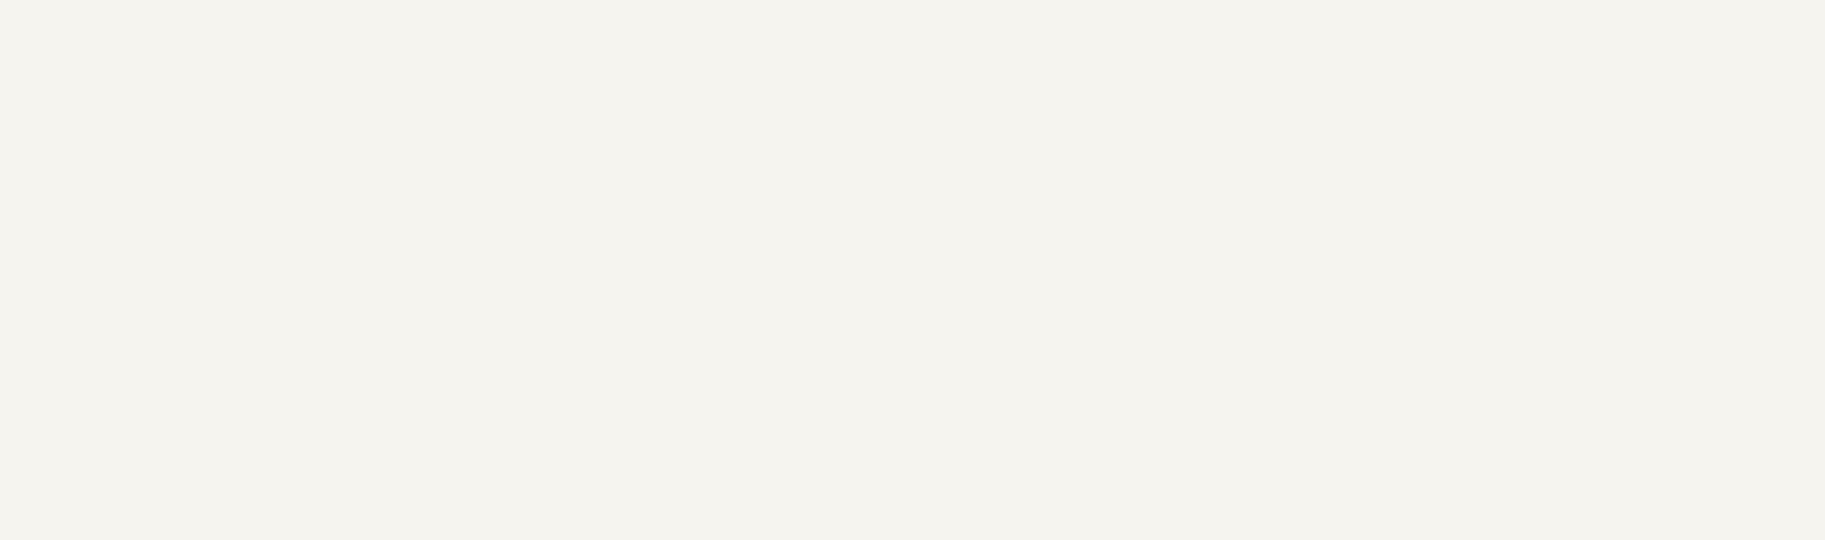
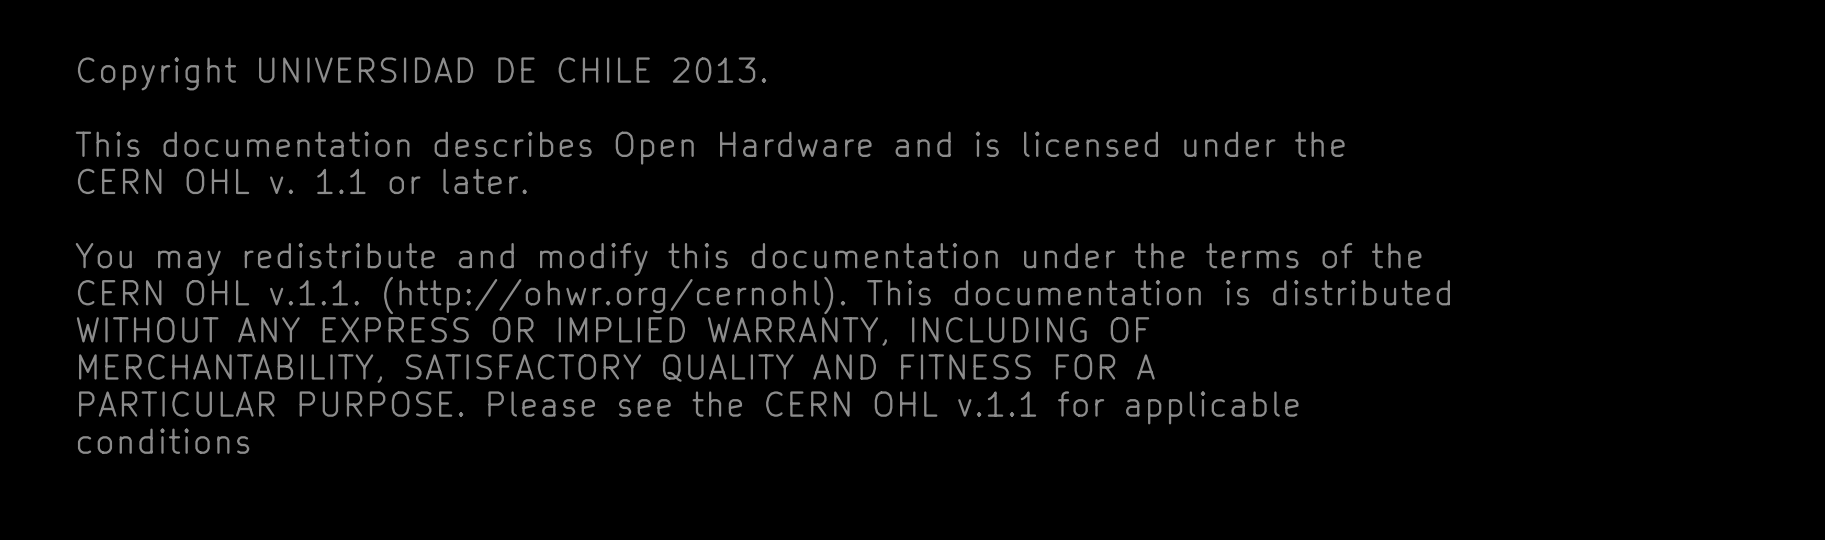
text: none -> Copyright UNIVERSIDAD DE CHILE 2013. (422, 73)
text: none -> This documentation describes Open Hardware and is licensed under the (710, 148)
text: none -> CERN OHL v. 1.1 or later. (302, 181)
text: none -> You may redistribute and modify this documentation under the terms of the (748, 259)
text: none -> CERN OHL v.1.1. (http://ohwr.org/cernohl). This documentation is distributed (763, 295)
text: none -> WITHOUT ANY EXPRESS OR IMPLIED WARRANTY, INCLUDING OF (613, 331)
text: none -> MERCHANTABILITY, SATISFACTORY QUALITY AND FITNESS FOR A (616, 368)
text: none -> PARTICULAR PURPOSE. Please see the CERN OHL v.1.1 for applicable (688, 407)
text: none -> conditions (163, 441)

